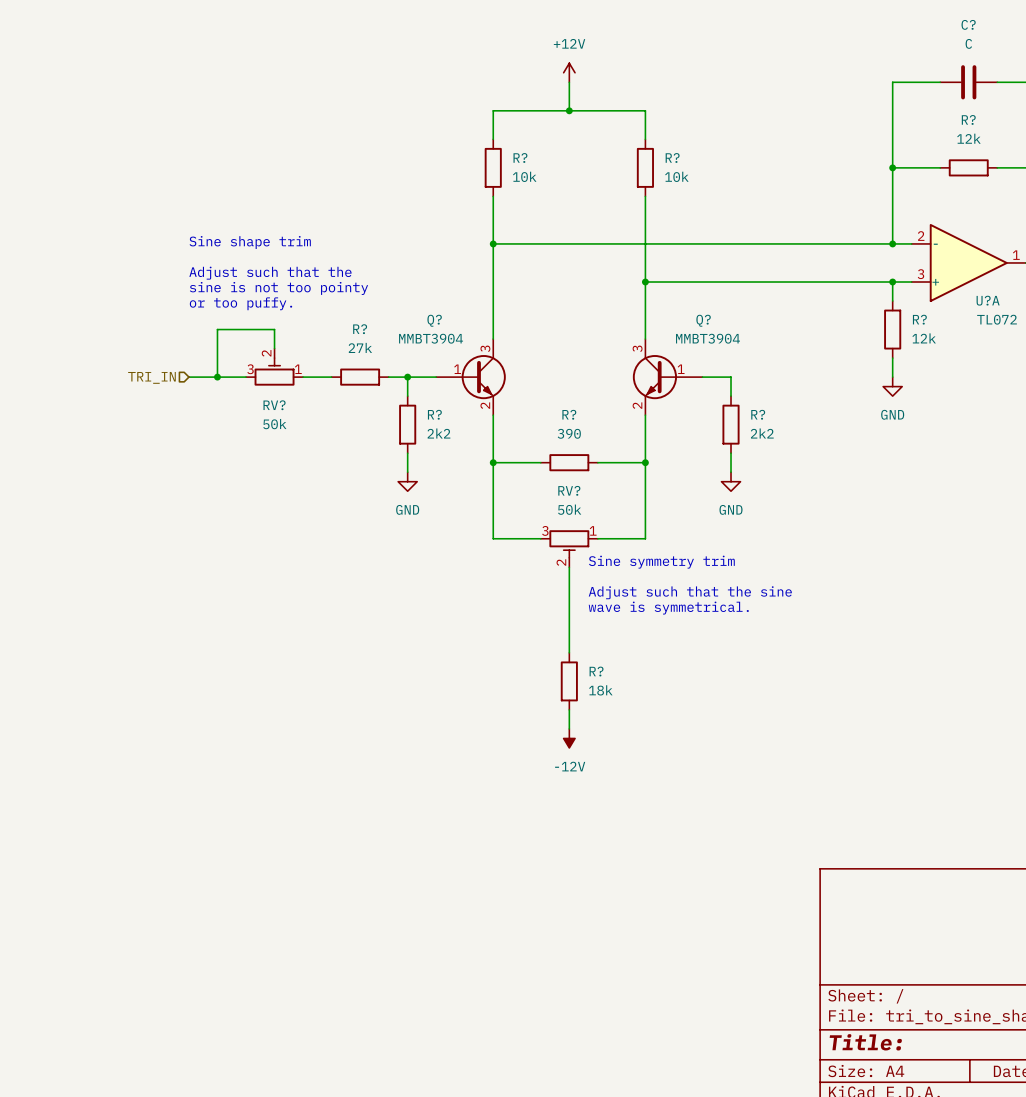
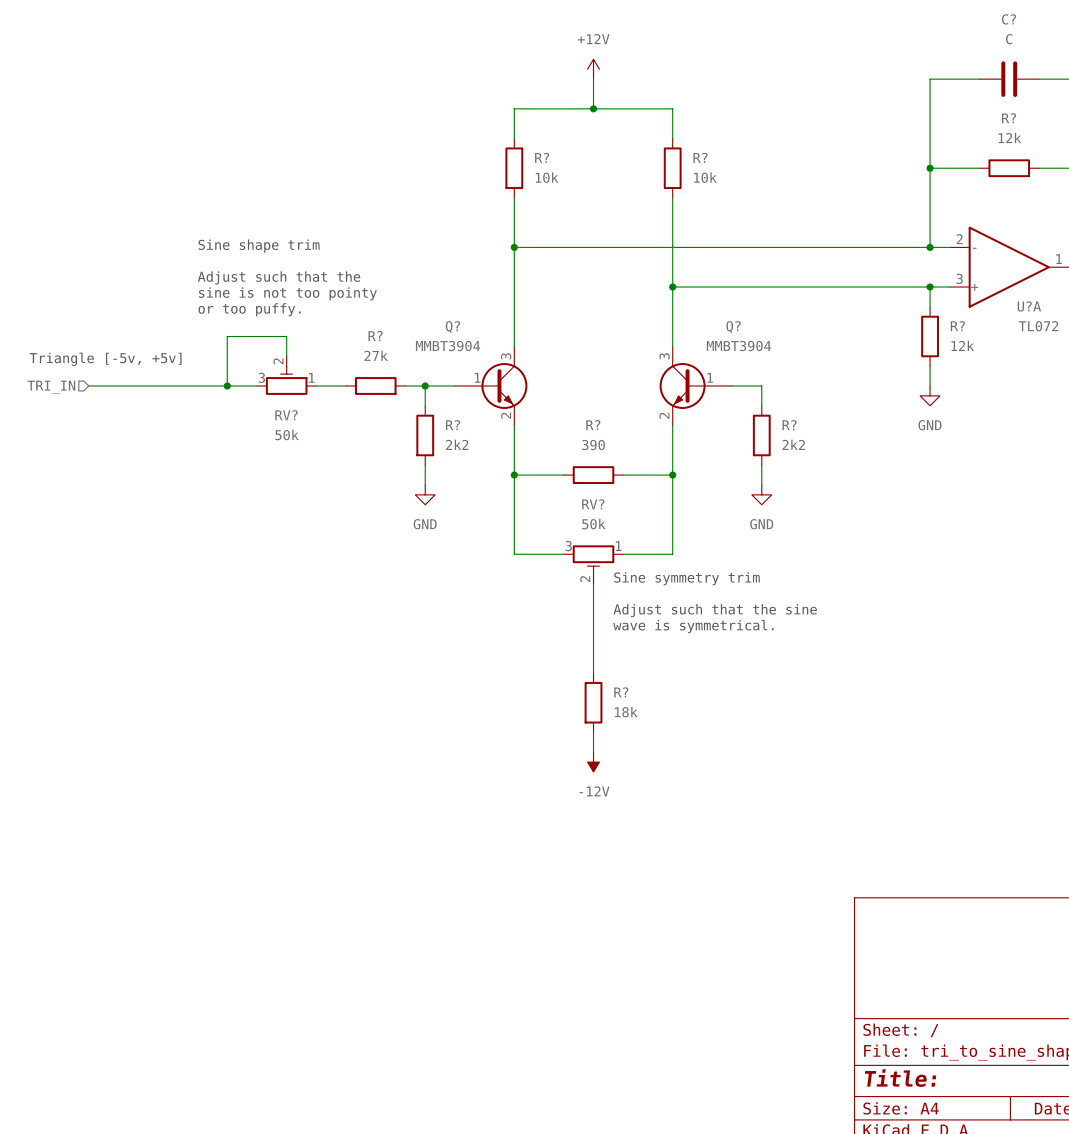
text: none -> Triangle [-5v, +5v] (105, 359)
wire: none -> (88, 385) (197, 385)
hierarchical label position: TRI_IN (151, 377) -> TRI_IN (51, 387)

